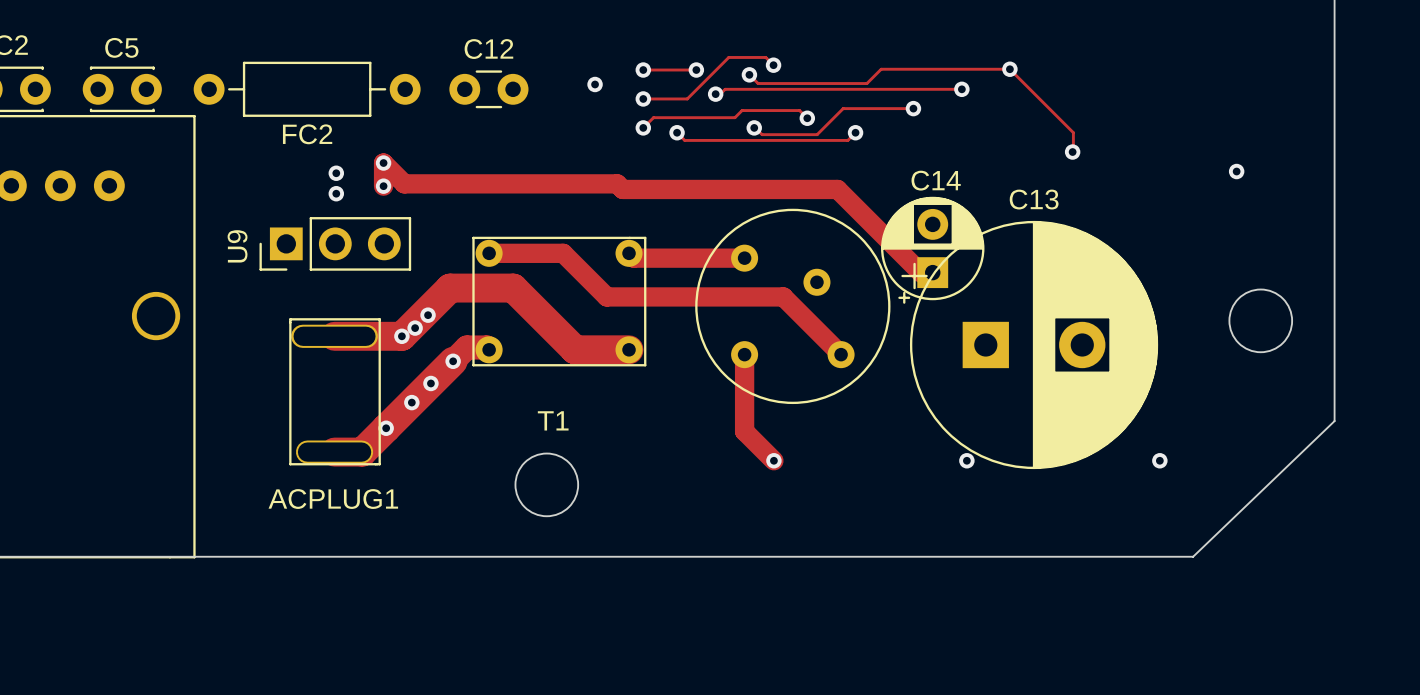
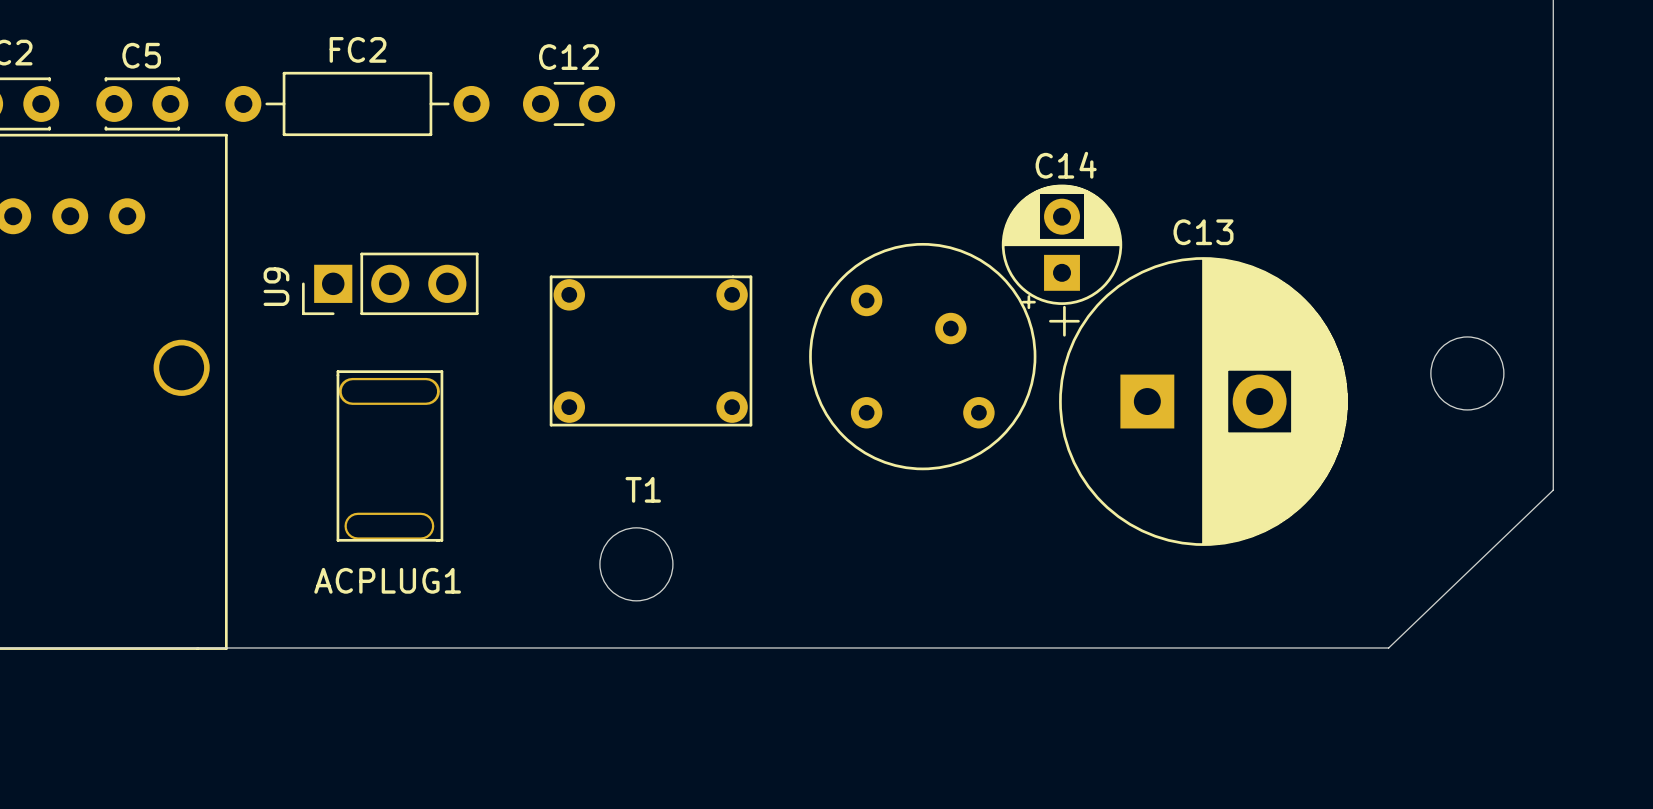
track: (773, 65) (765, 57) (728, 57) (687, 98) (643, 98) -> none
via: (773, 65) -> none
via: (1009, 69) -> none
track: (643, 70) (696, 70) -> none
via: (643, 70) -> none
via: (696, 70) -> none
track: (749, 74) (758, 83) (866, 83) (881, 69) (1009, 69) (1073, 132) (1072, 152) -> none
via: (749, 74) -> none
via: (595, 84) -> none
track: (961, 89) (725, 89) (720, 94) (715, 94) -> none
via: (961, 89) -> none
via: (715, 94) -> none
via: (643, 98) -> none
track: (913, 108) (843, 108) (817, 134) (762, 134) (754, 127) -> none
via: (913, 108) -> none
track: (807, 118) (799, 110) (742, 110) (734, 117) (653, 117) (643, 127) -> none
via: (807, 118) -> none
via: (643, 127) -> none
via: (754, 127) -> none
track: (677, 132) (684, 140) (847, 140) (855, 132) -> none
via: (677, 132) -> none
via: (855, 132) -> none
FC2 name position: FC2 (307, 134) -> FC2 (358, 49)
via: (1072, 152) -> none
via: (383, 163) -> none
via: (1236, 171) -> none
via: (336, 173) -> none
track: (383, 186) (383, 163) (404, 183) (617, 183) (622, 189) (837, 189) (920, 272) (932, 272) -> none
via: (383, 186) -> none
via: (336, 193) -> none
C14 position: (932, 250) -> (1062, 246)
track: (489, 253) (563, 253) (606, 296) (783, 296) (841, 354) -> none
track: (629, 253) (633, 258) (744, 258) -> none
via: (428, 315) -> none
via: (415, 328) -> none
track: (334, 336) (401, 336) (450, 288) (513, 288) (574, 349) (629, 349) -> none
via: (401, 336) -> none
track: (489, 349) (486, 347) (466, 347) (362, 452) (334, 452) -> none
track: (744, 354) (744, 431) (773, 460) -> none
via: (453, 361) -> none
via: (430, 383) -> none
via: (411, 402) -> none
via: (386, 428) -> none
via: (773, 460) -> none
via: (966, 460) -> none
via: (1159, 460) -> none

